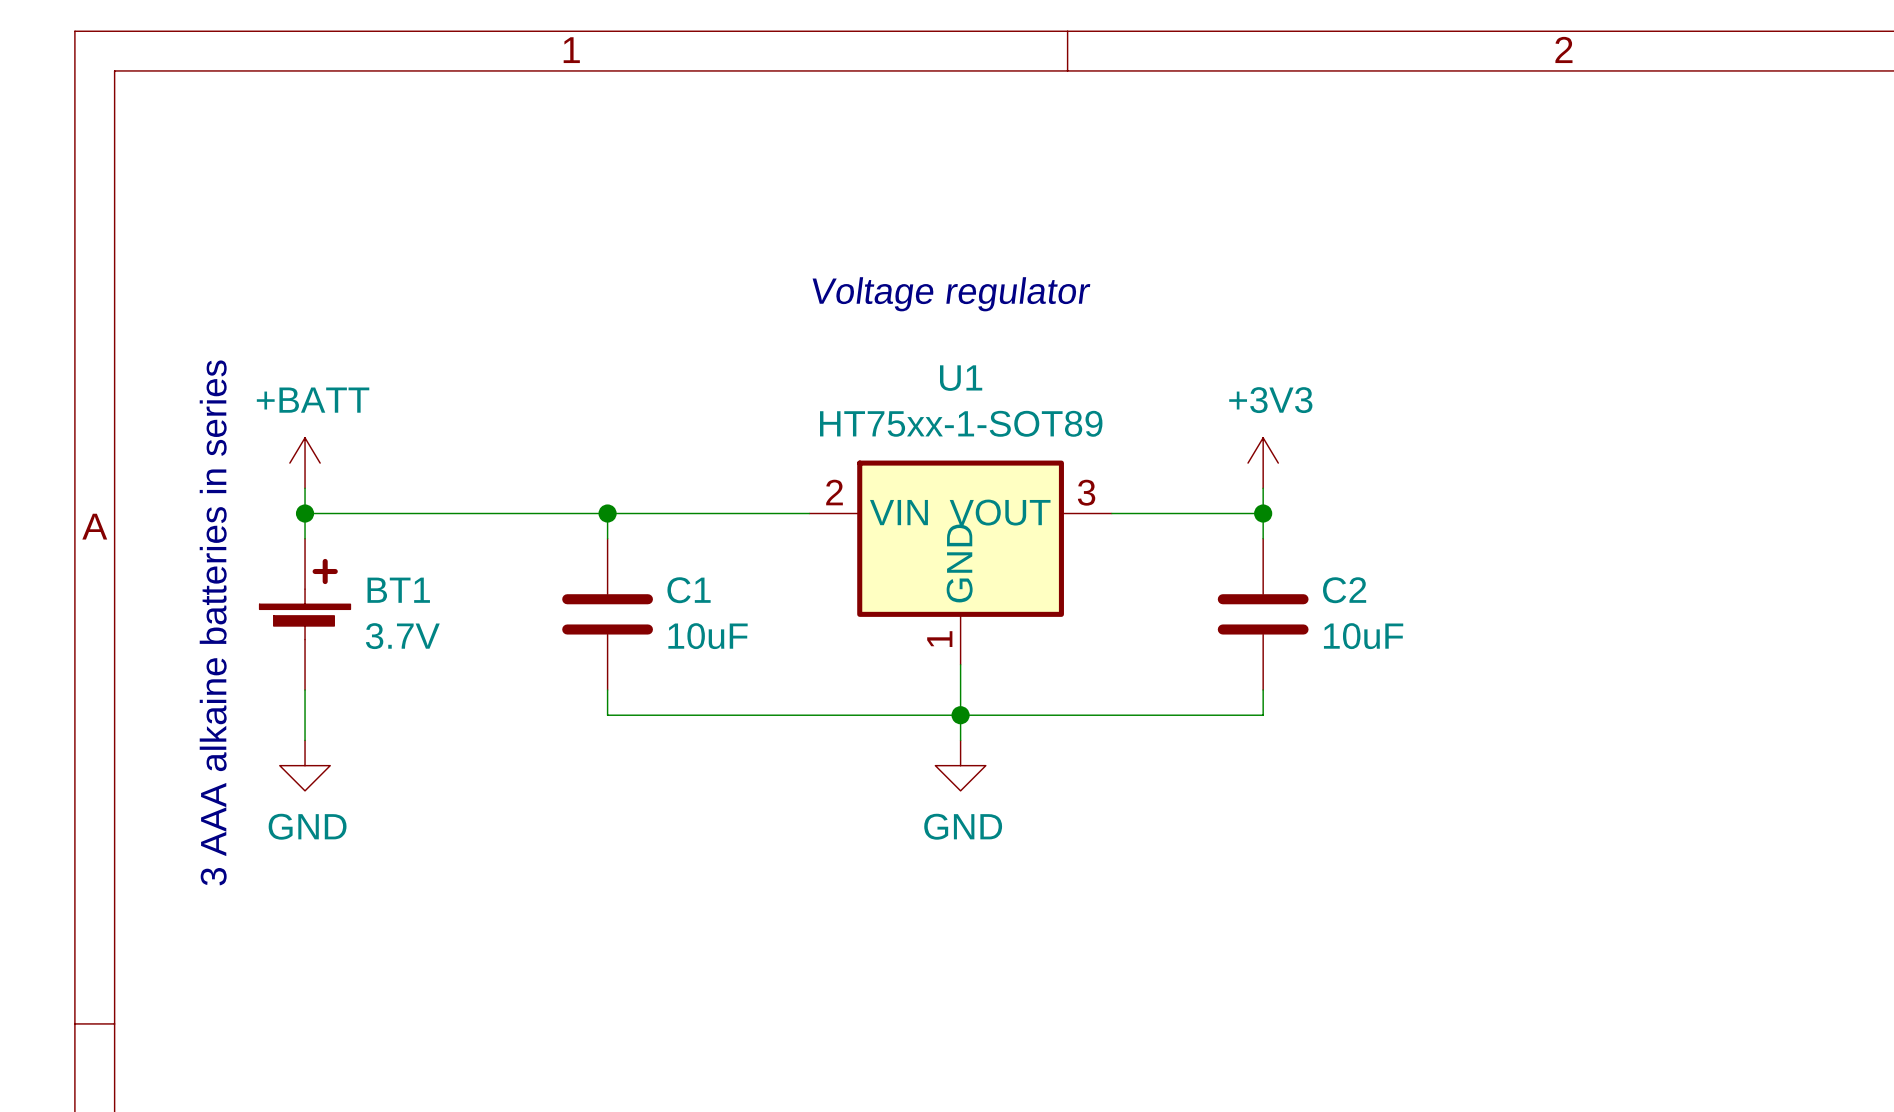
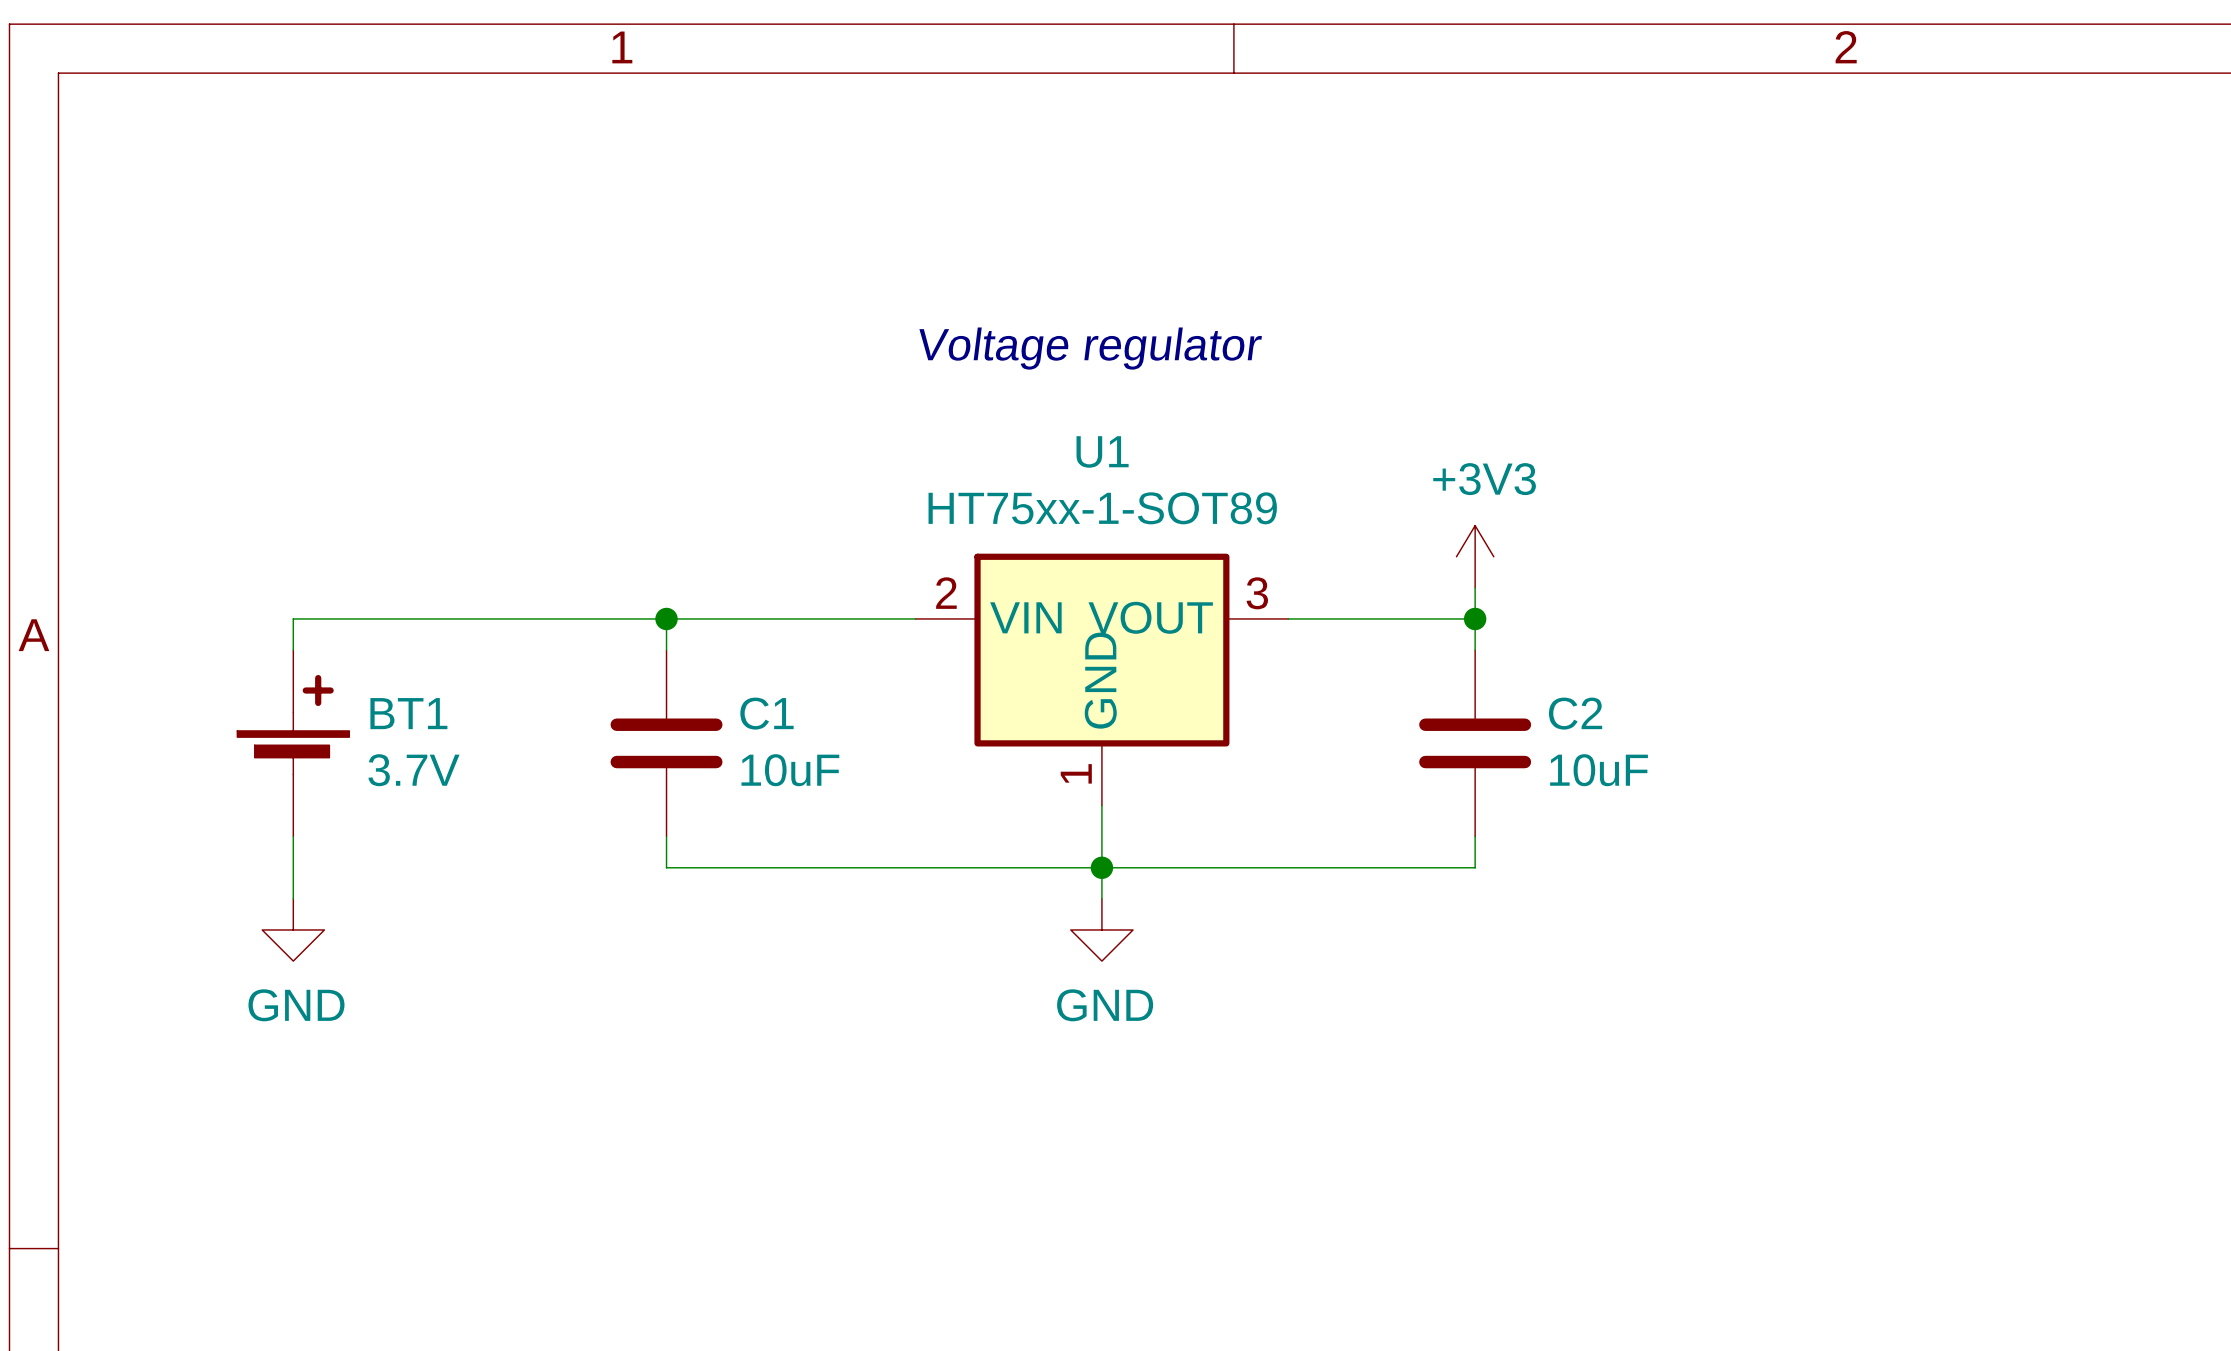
power symbol: +BATT (305, 463) -> none
wire: (305, 488) (305, 513) -> none
junction: (305, 513) -> none
text: 3 AAA alkaine batteries in series (213, 622) -> none

